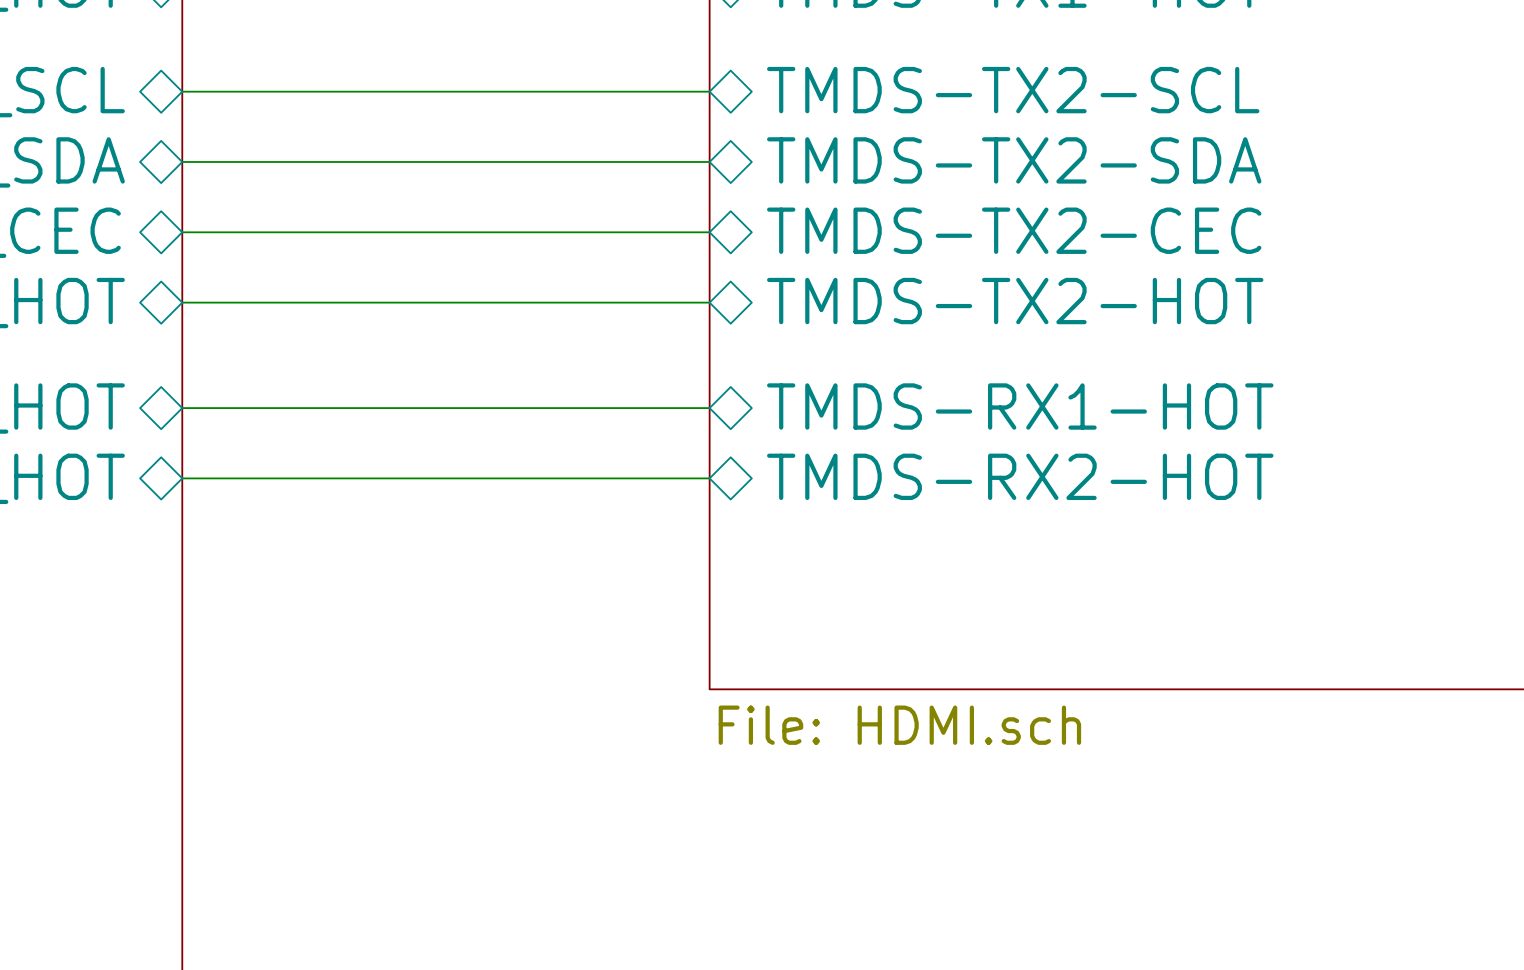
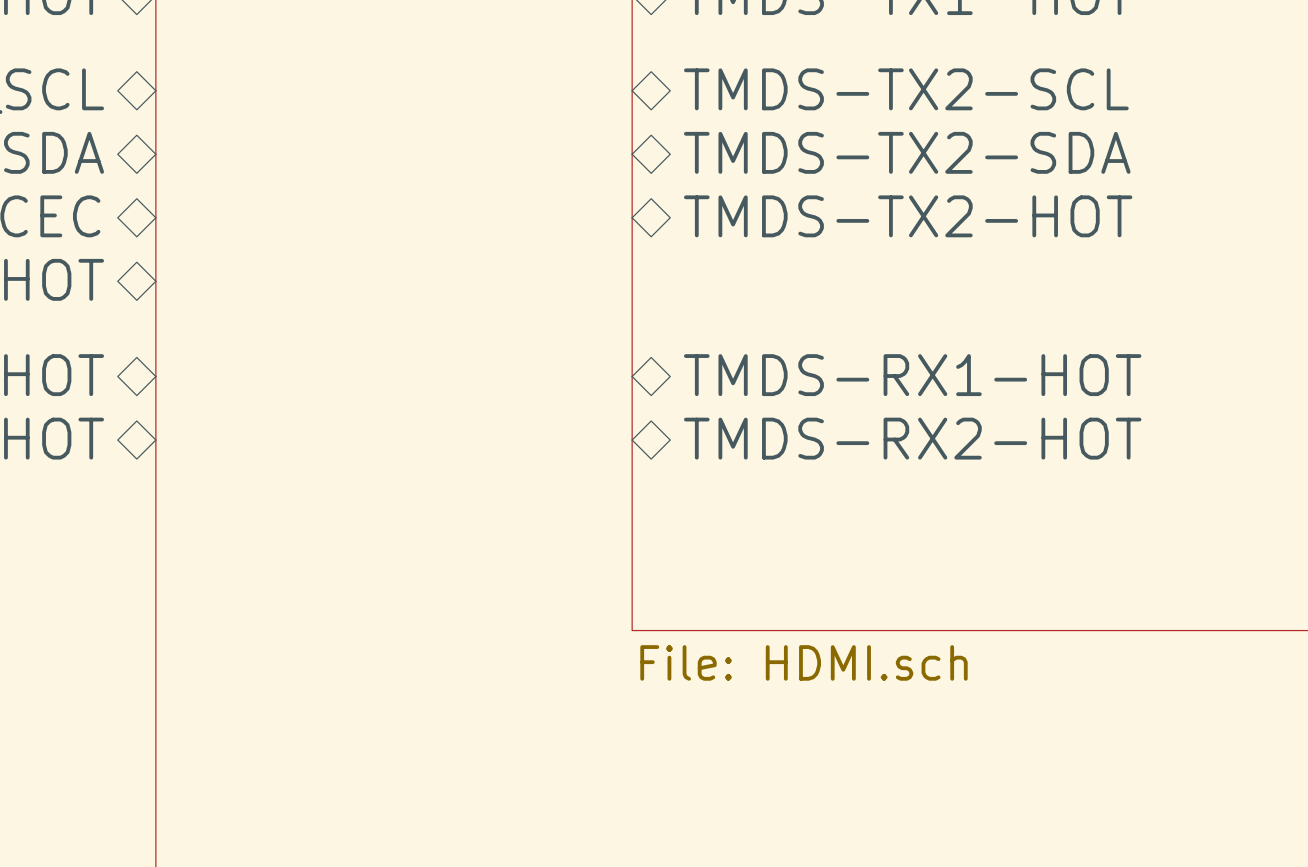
wire: (182, 91) (709, 91) -> none
wire: (182, 161) (709, 161) -> none
sheet pin: TMDS-TX2-CEC (1014, 230) -> TMDS-TX2-HOT (908, 216)
wire: (182, 232) (709, 232) -> none
sheet pin: TMDS-TX2-HOT (1015, 301) -> none
wire: (182, 302) (709, 302) -> none
wire: (182, 408) (709, 408) -> none
wire: (182, 478) (709, 478) -> none

